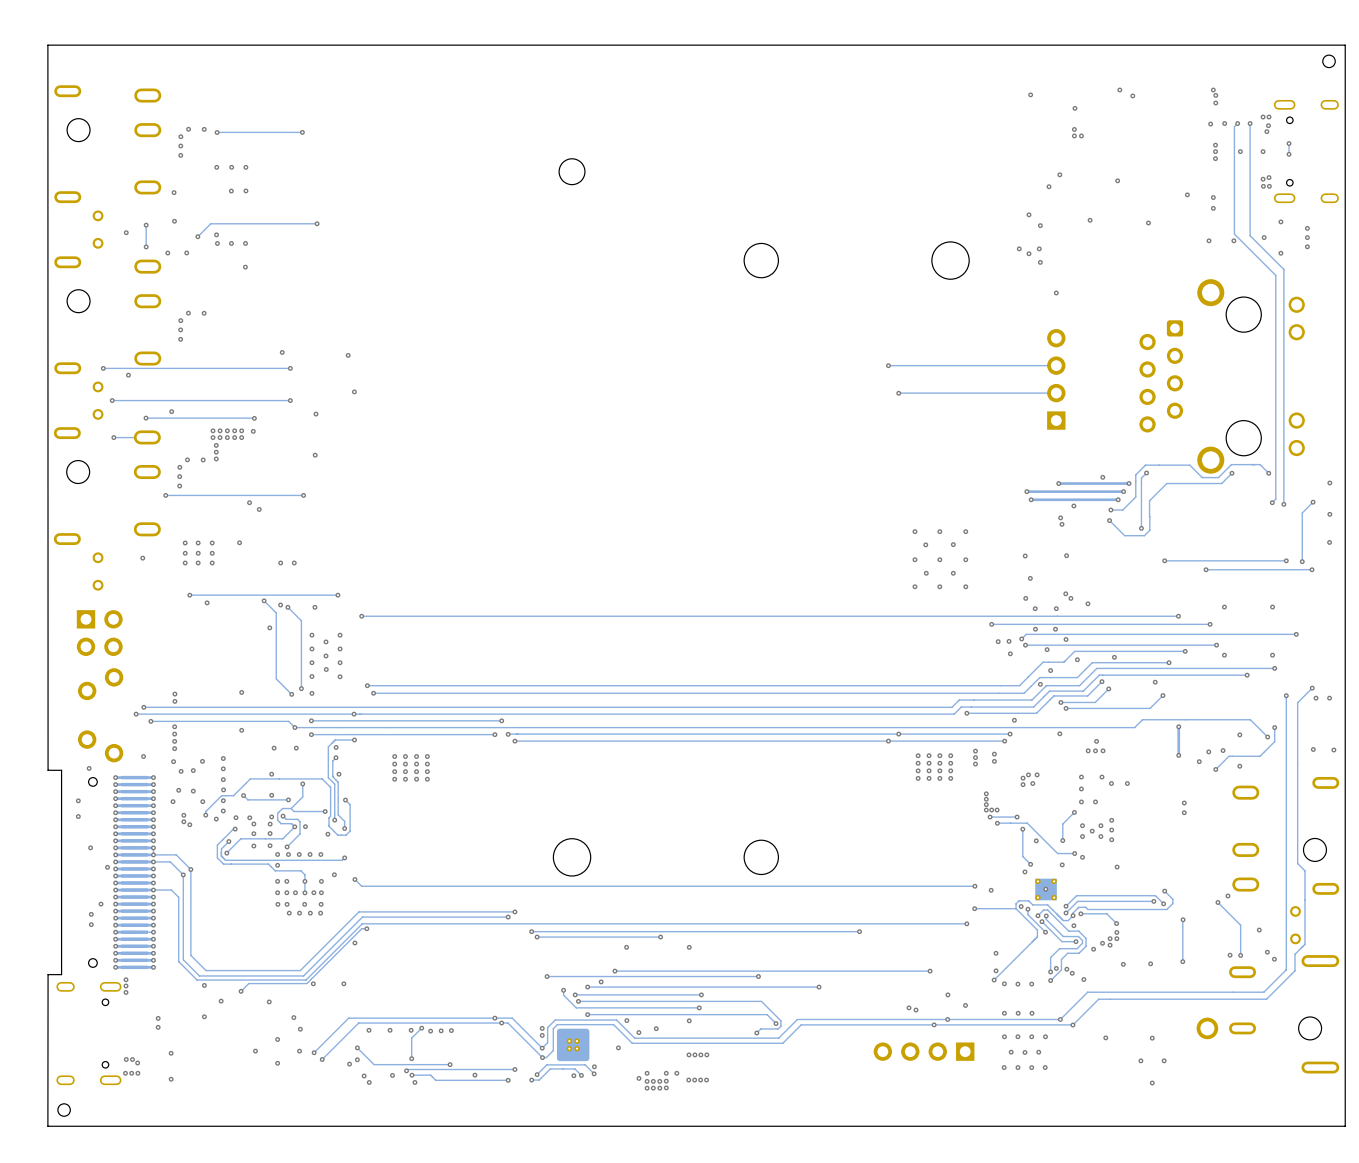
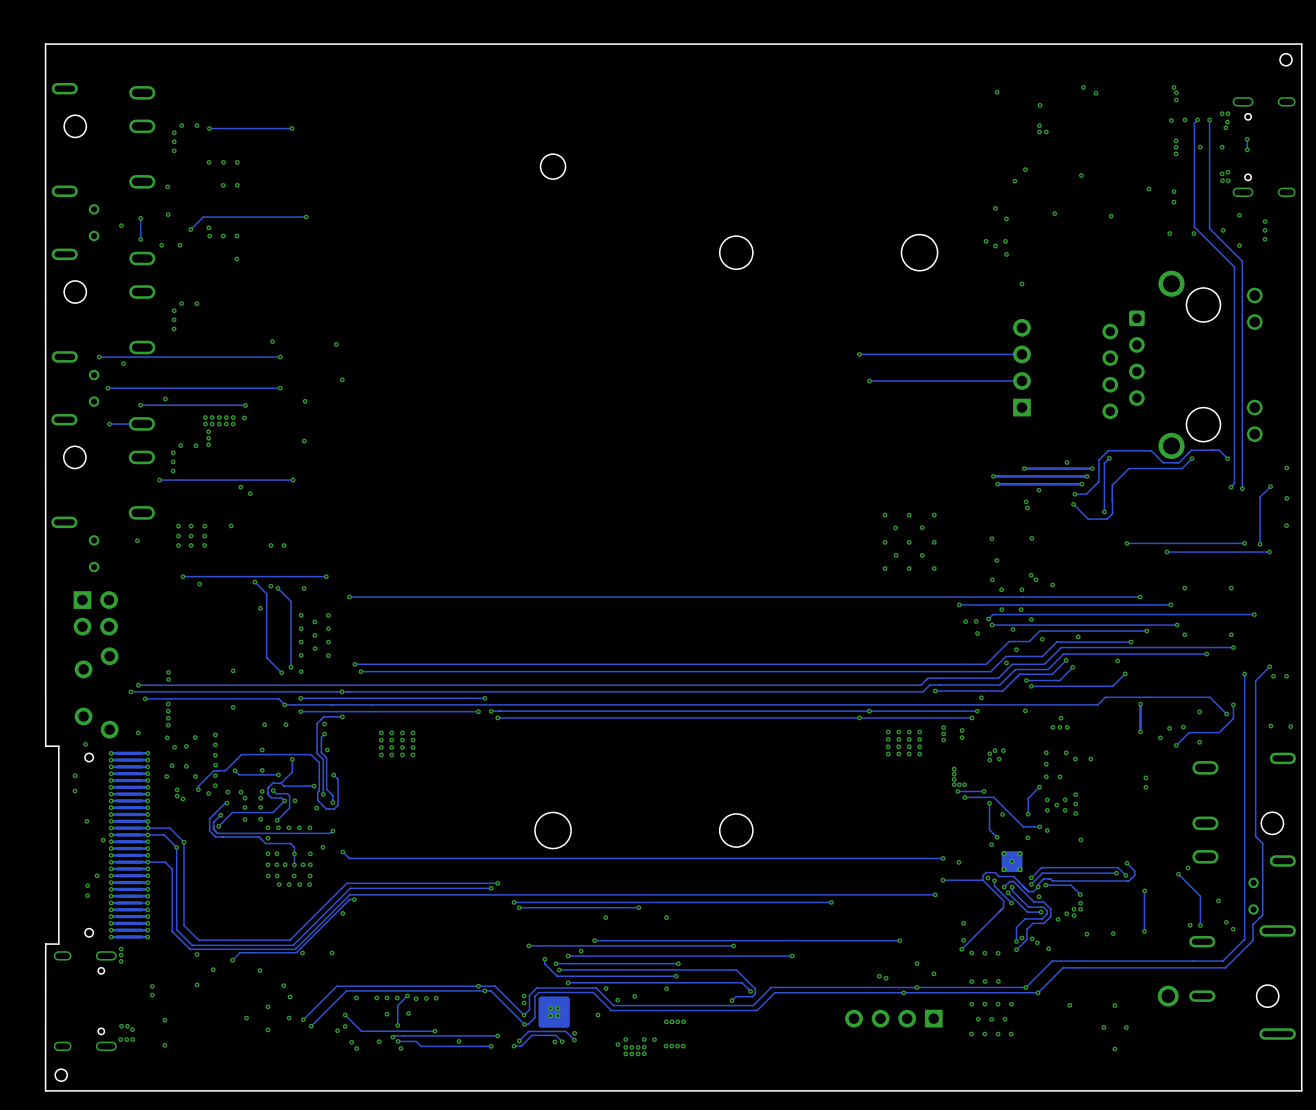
via: none -> (387, 997)
via: none -> (408, 1013)
via: none -> (387, 1014)

